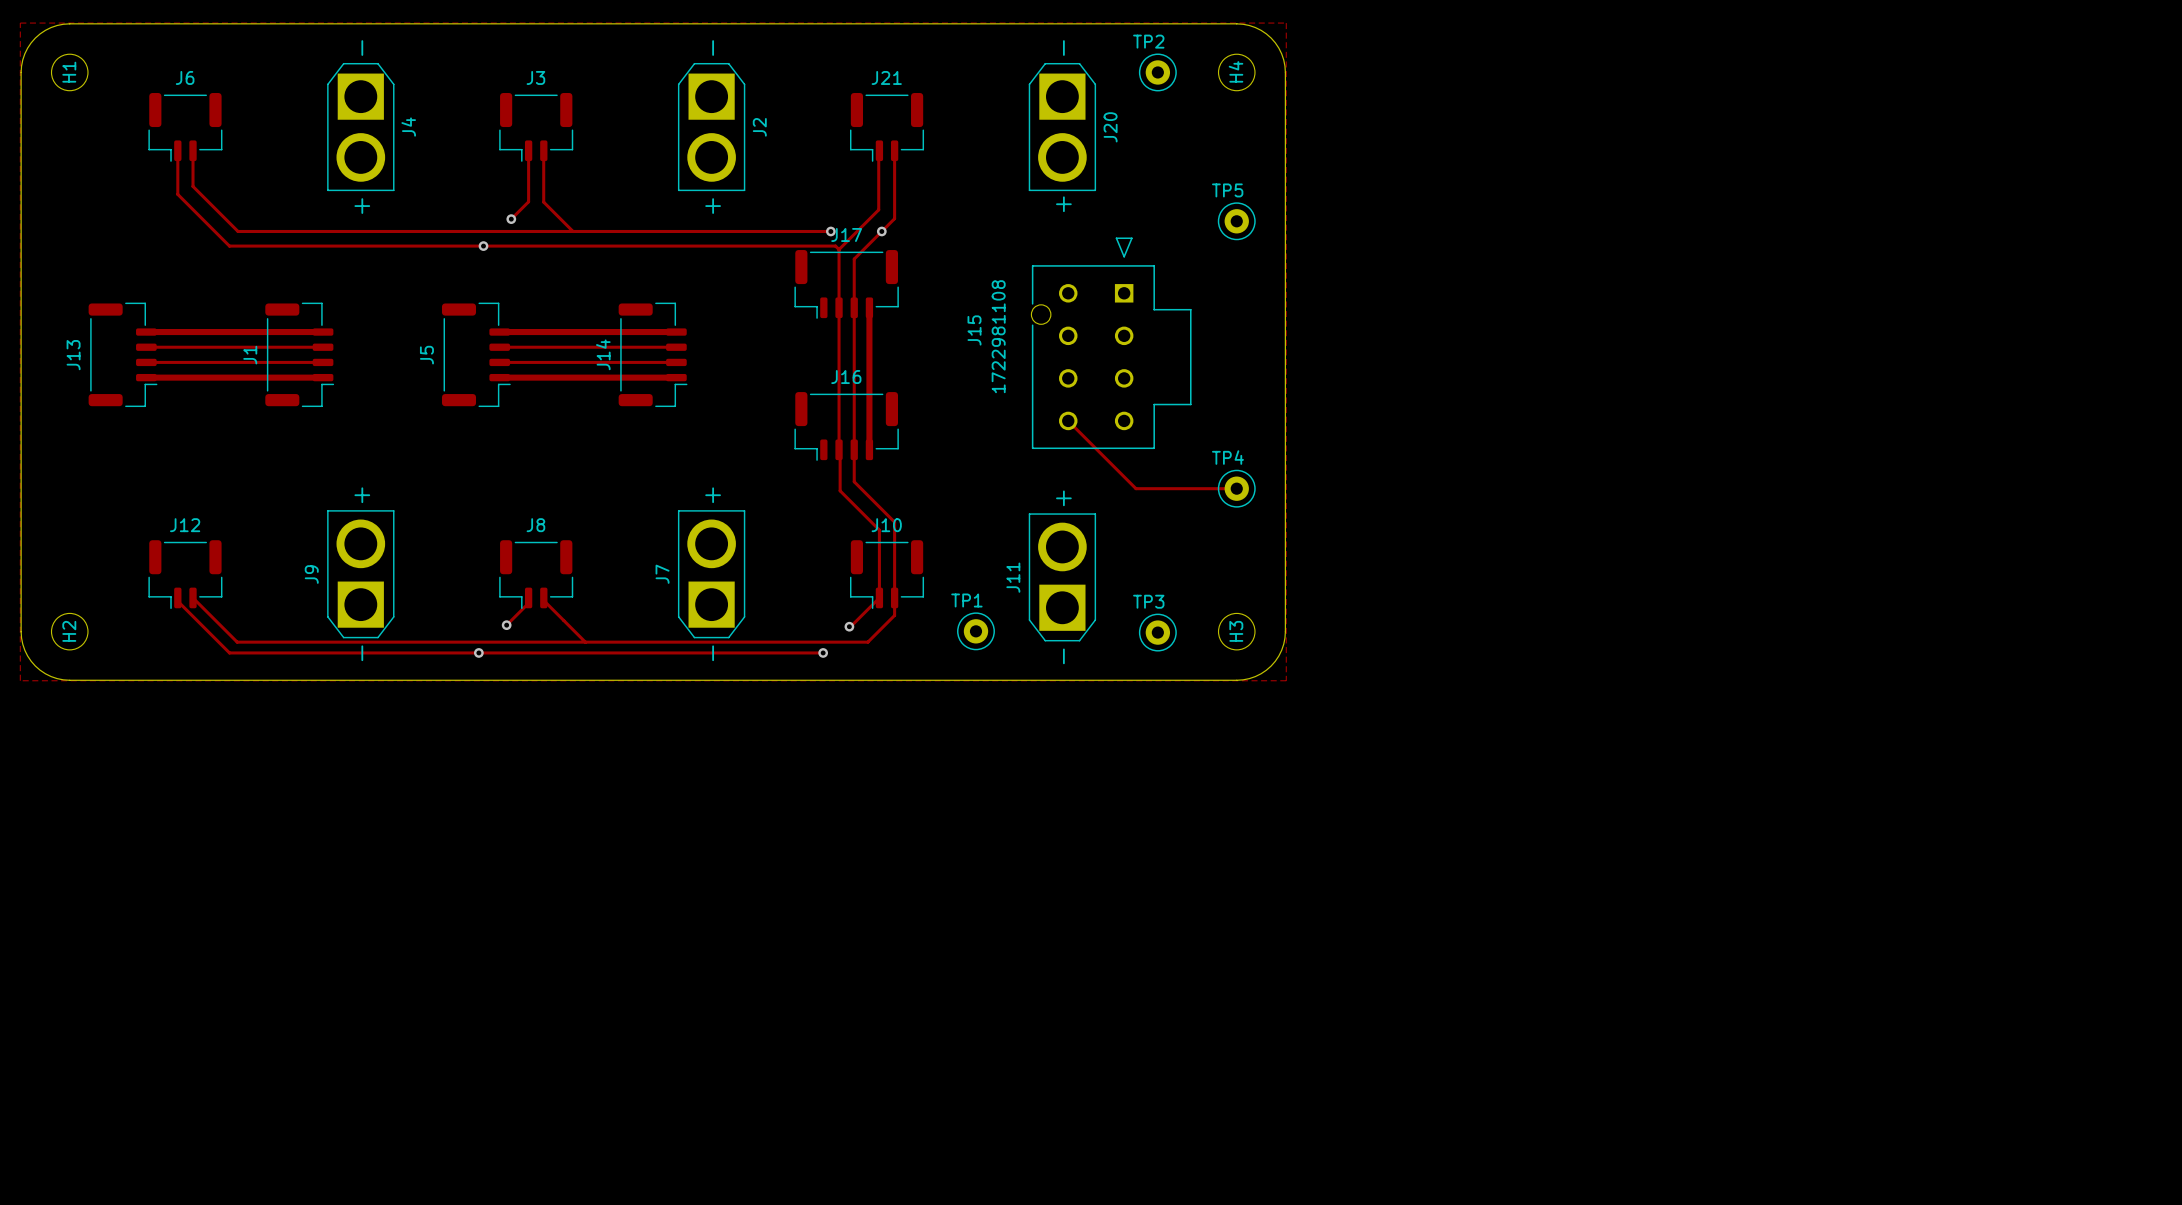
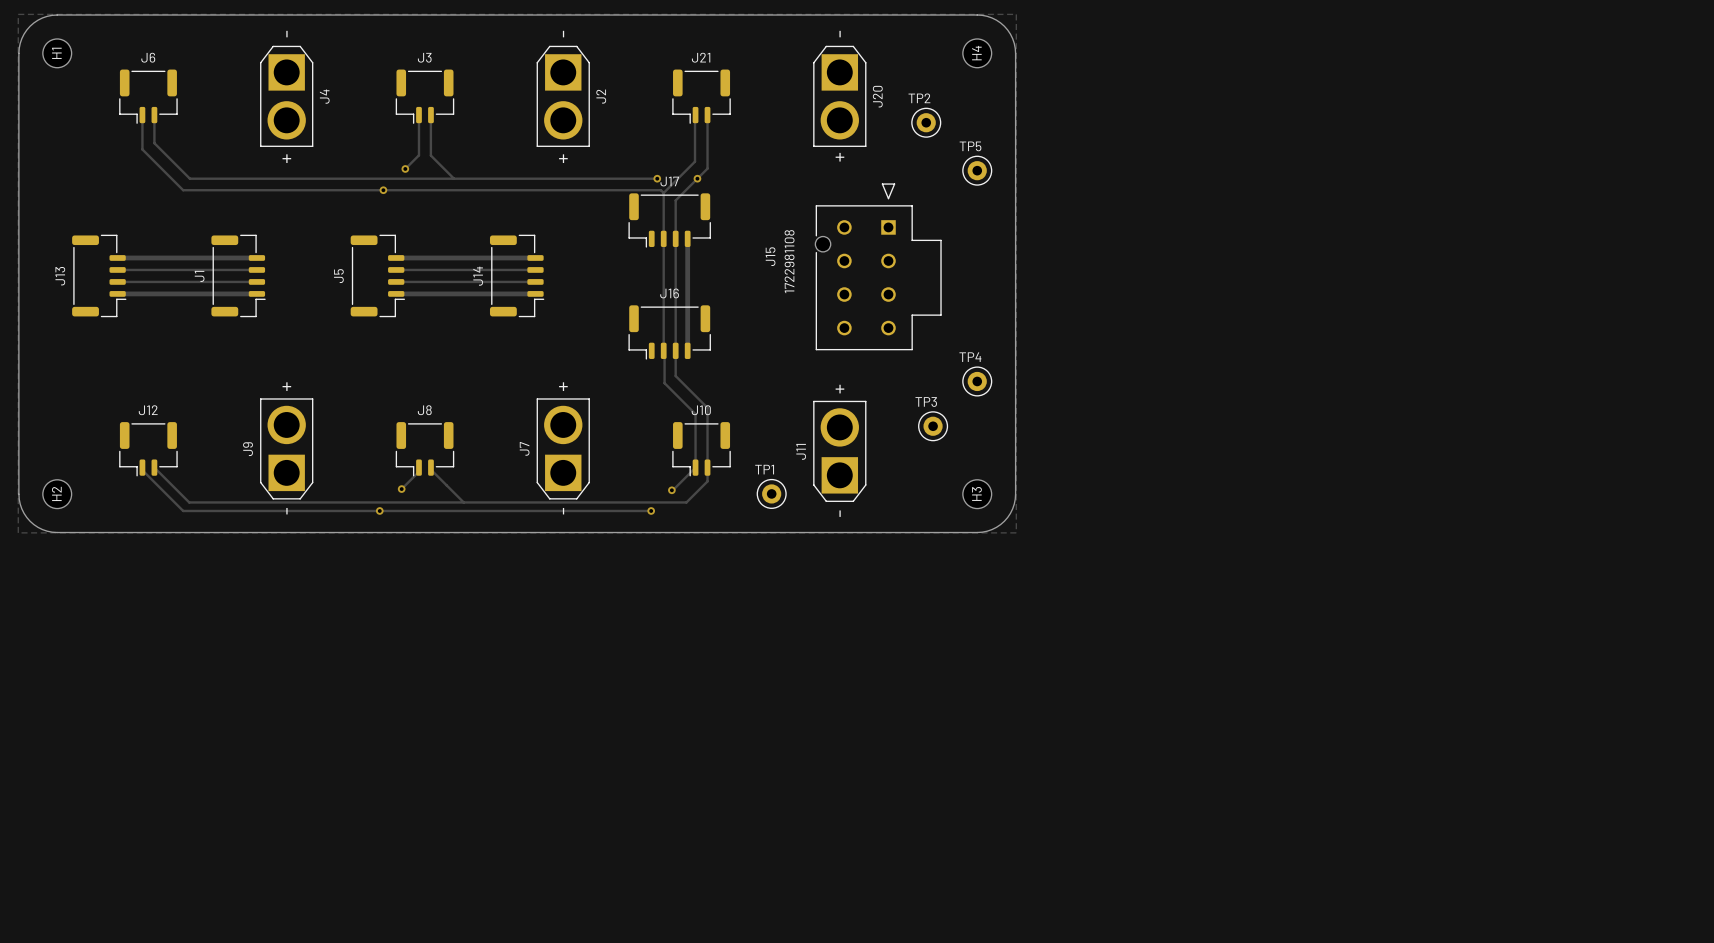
TP2 position: (1157, 72) -> (926, 122)
track: (1068, 420) (1135, 488) (1236, 488) -> none
TP3 position: (1157, 632) -> (933, 426)

